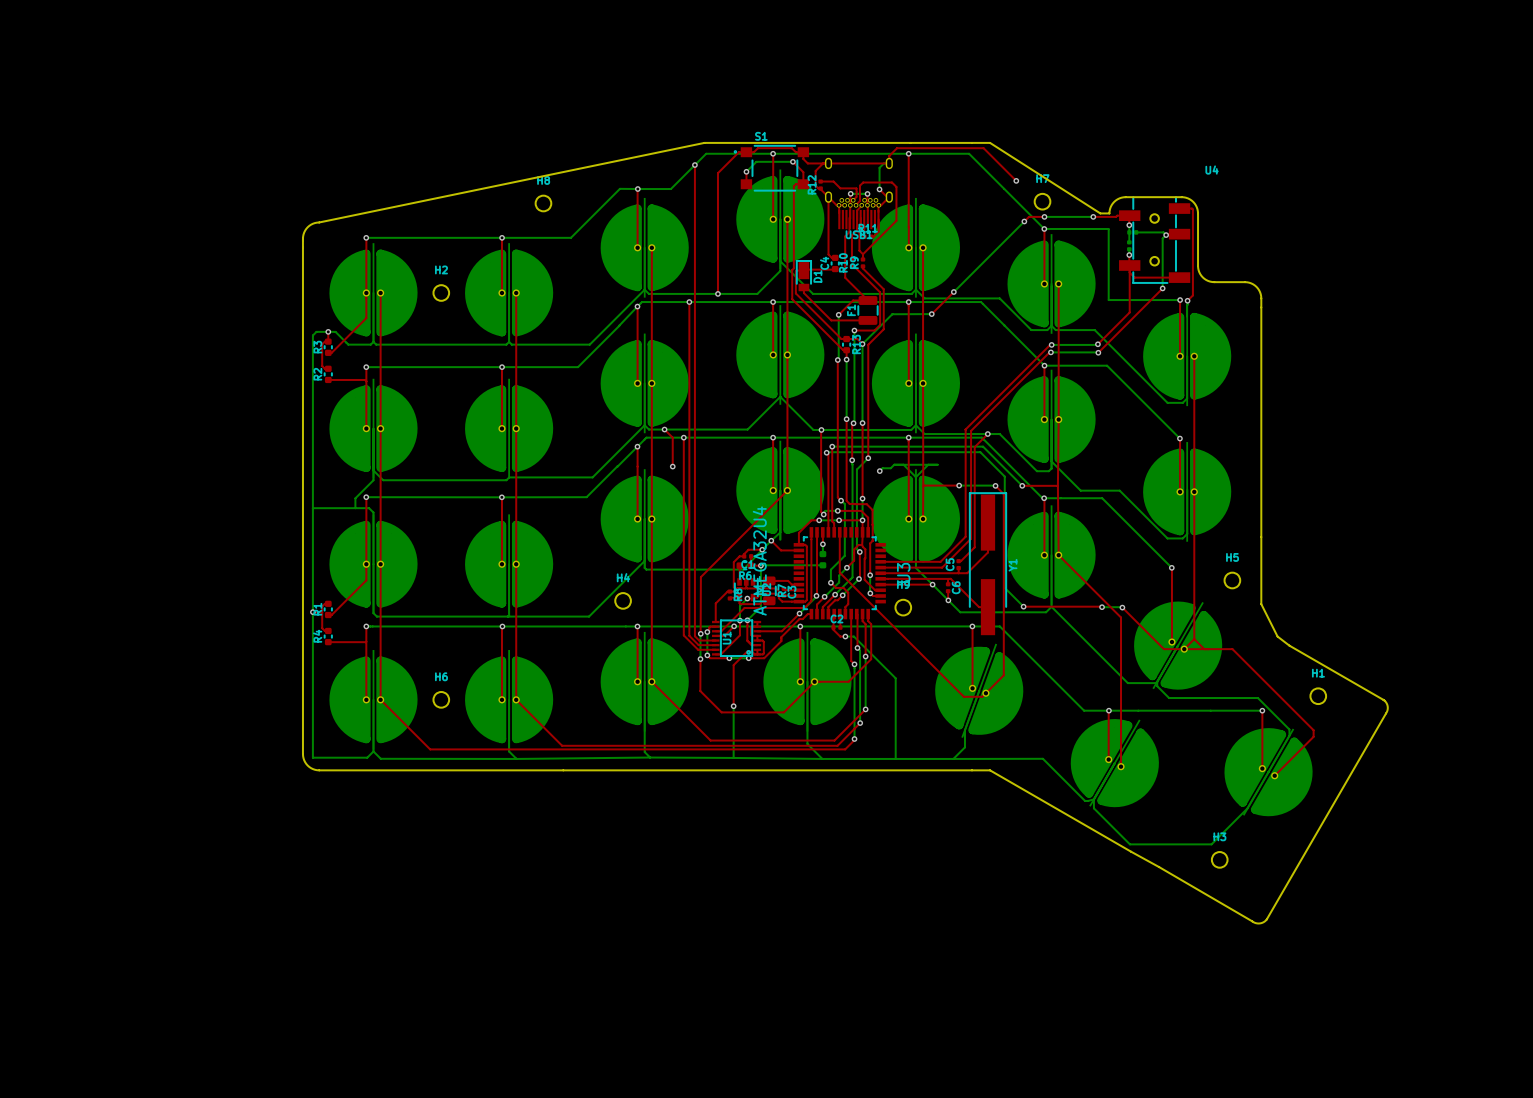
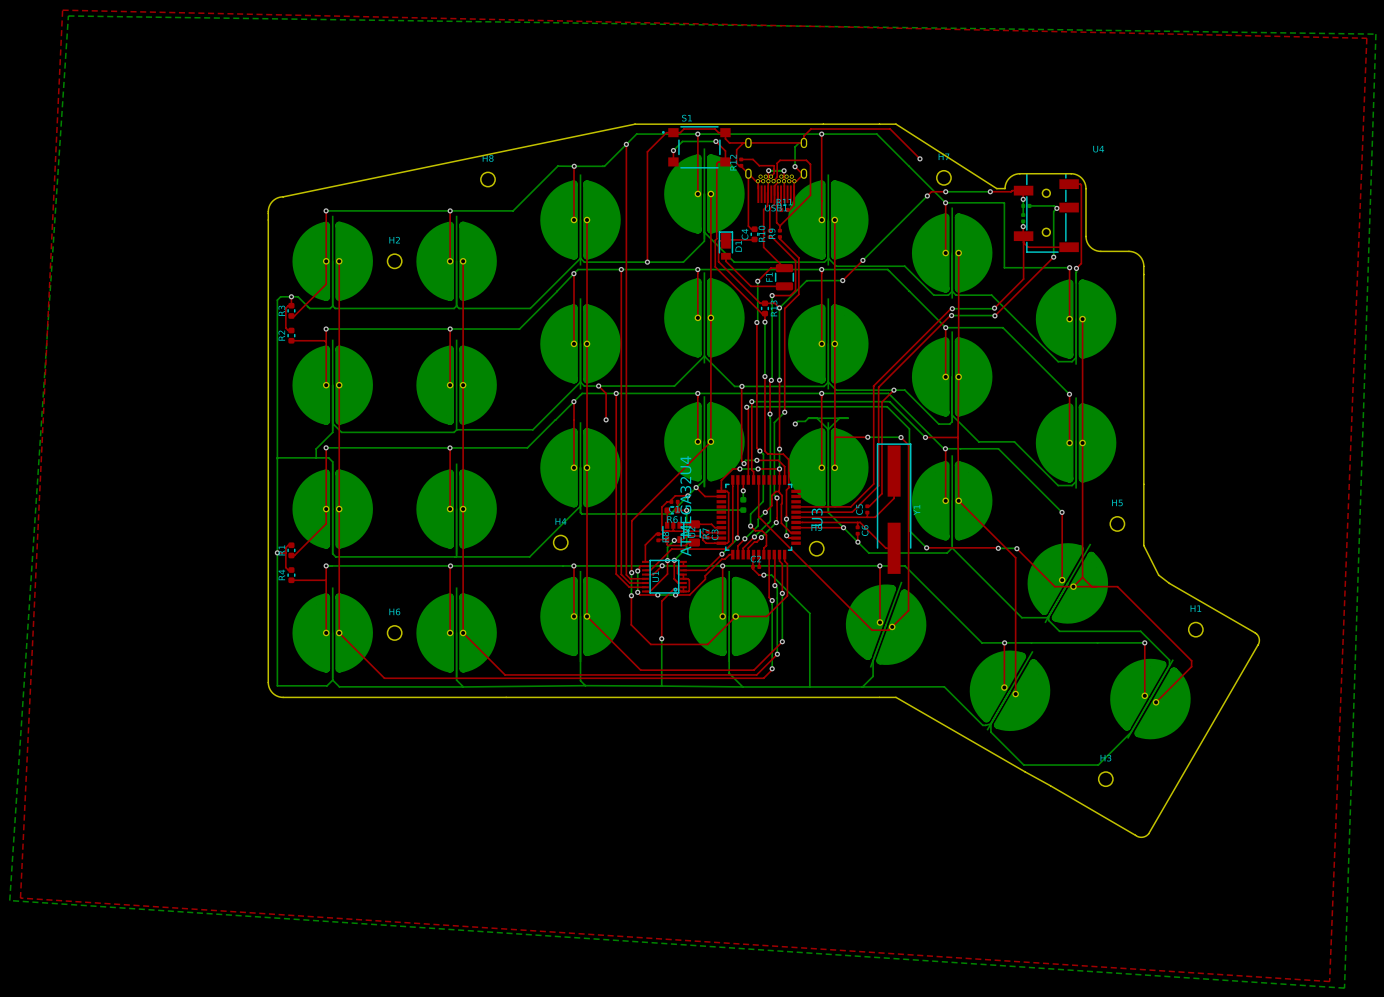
top zone outline: none -> (62, 10) (20, 898) (1329, 981) (1366, 38) (62, 10)
bottom zone outline: none -> (68, 15) (9, 900) (1344, 988) (1375, 34) (68, 15)

